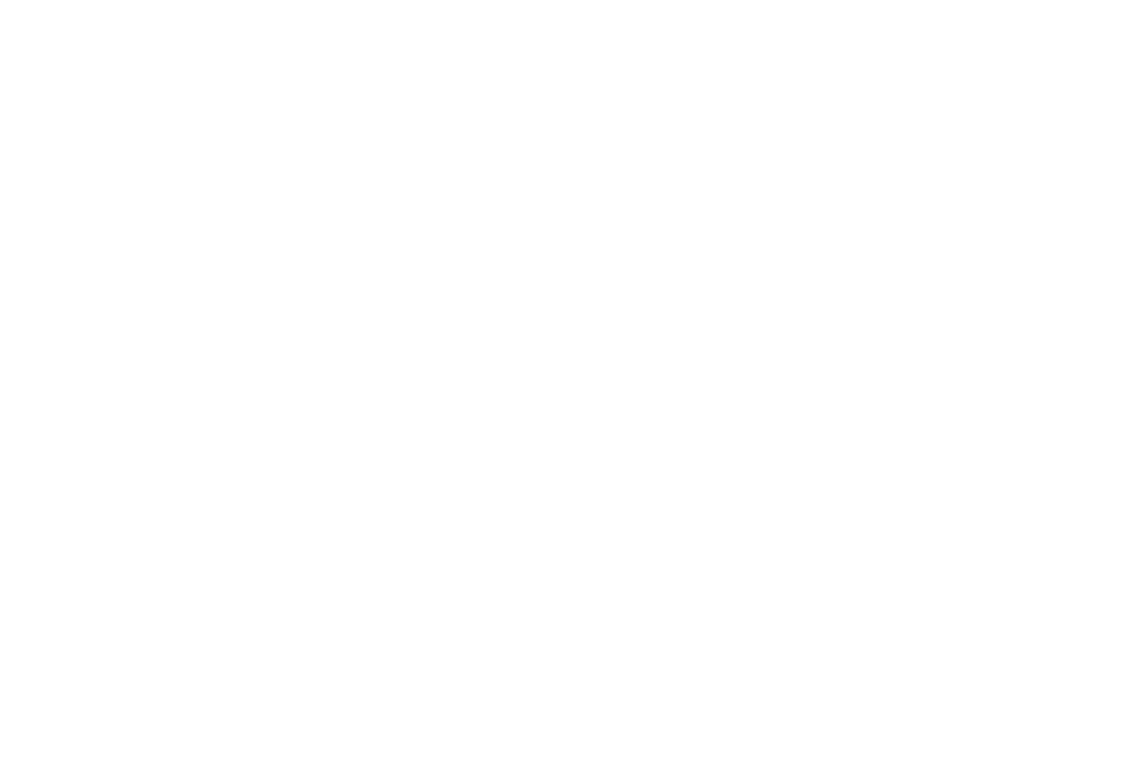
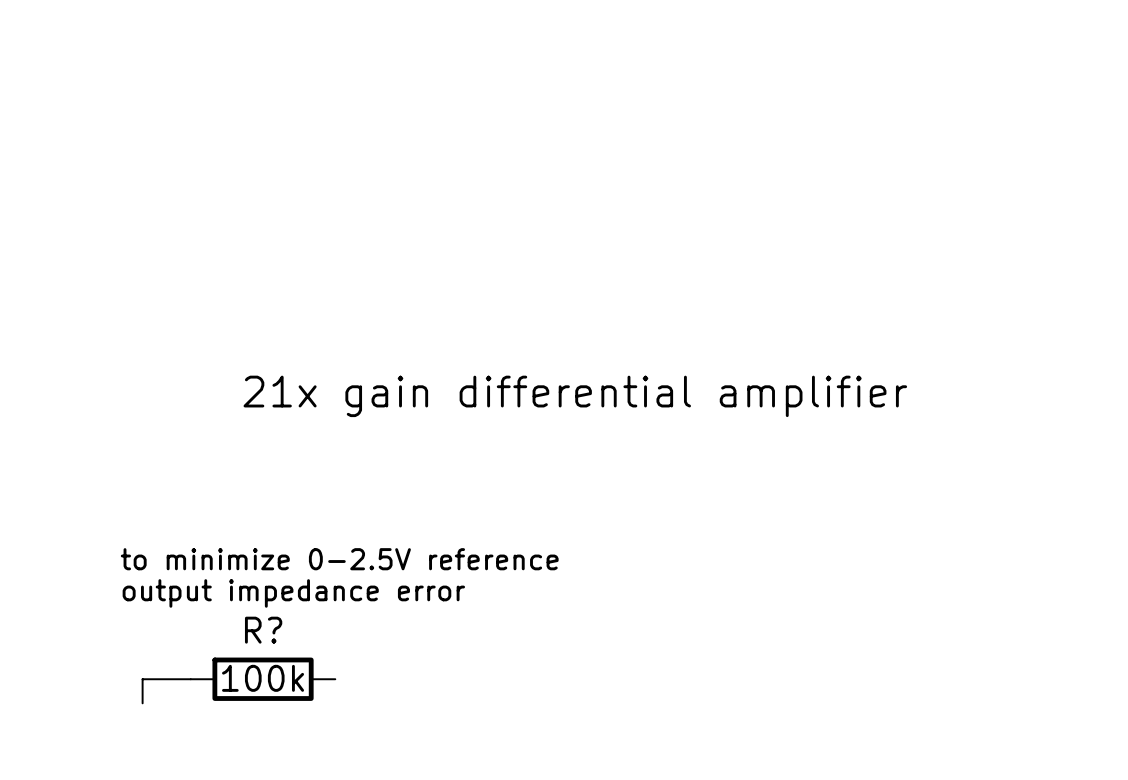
text: none -> 21x gain differential amplifier (575, 396)
text: none -> to minimize 0-2.5V reference (339, 559)
text: none -> output impedance error (293, 593)
wire: none -> (190, 679) (142, 679) (142, 703)
R?: none -> 100k (263, 679)

